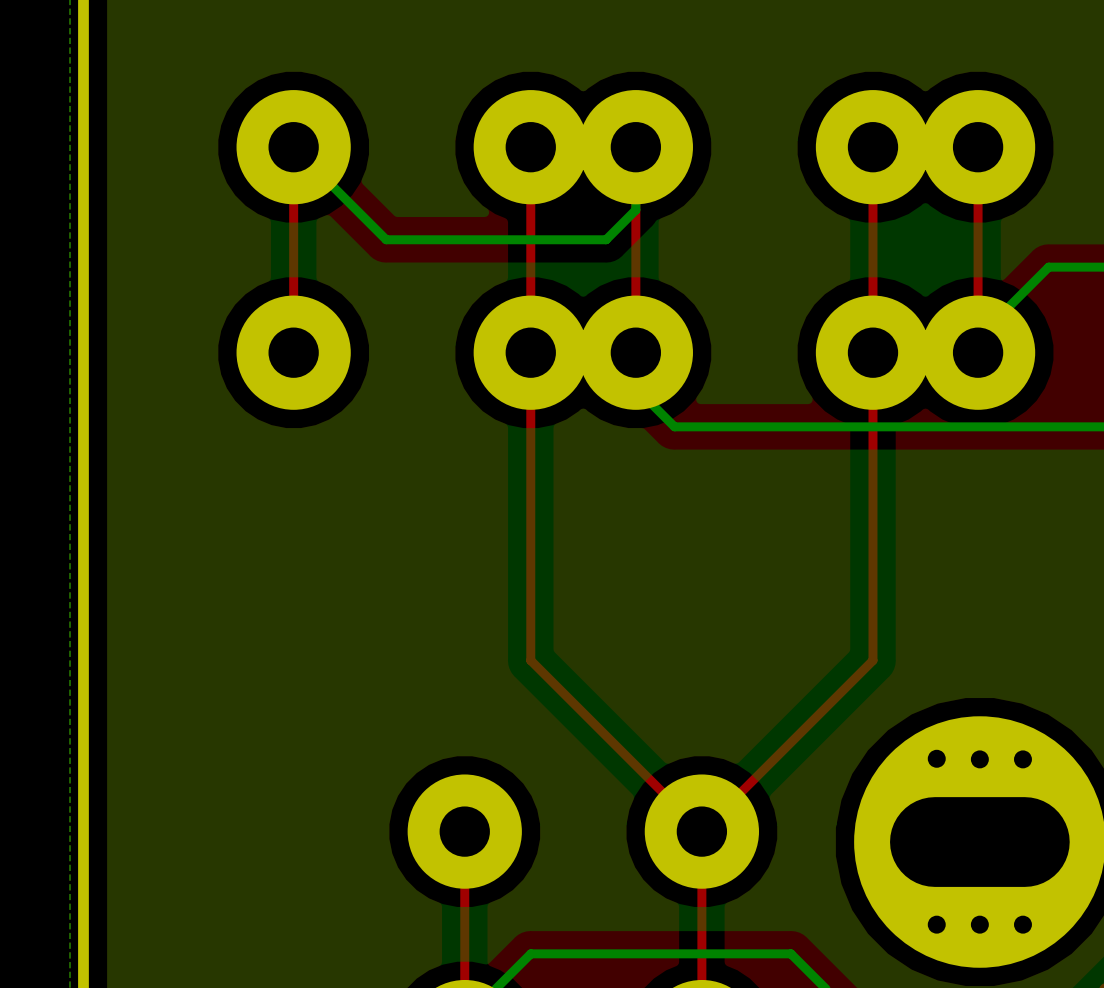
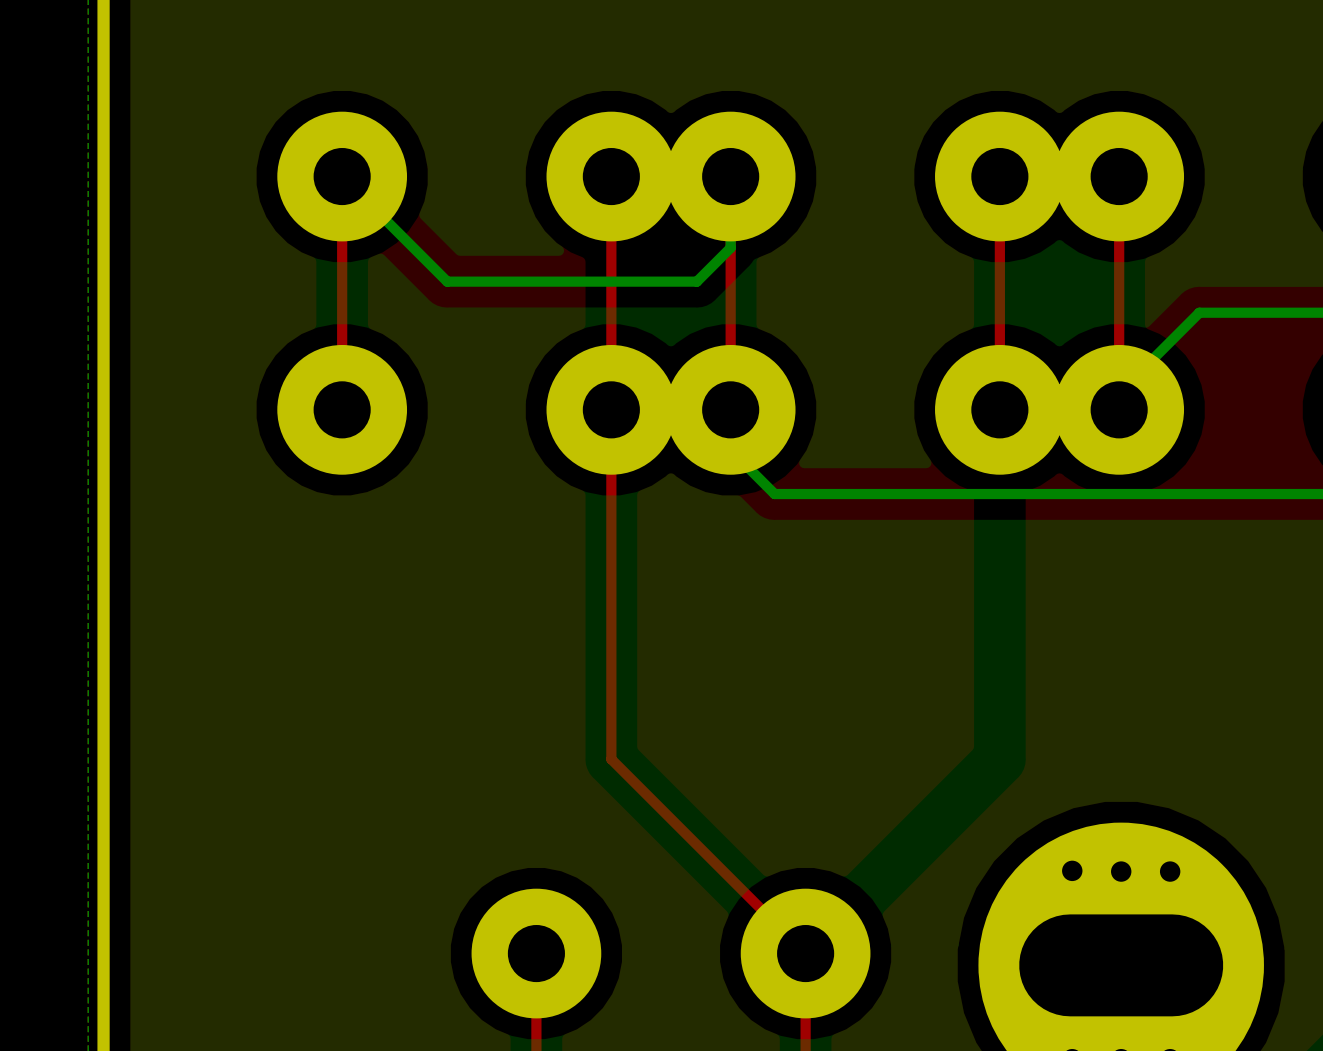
top track: (872, 352) (872, 660) (701, 831) -> none

